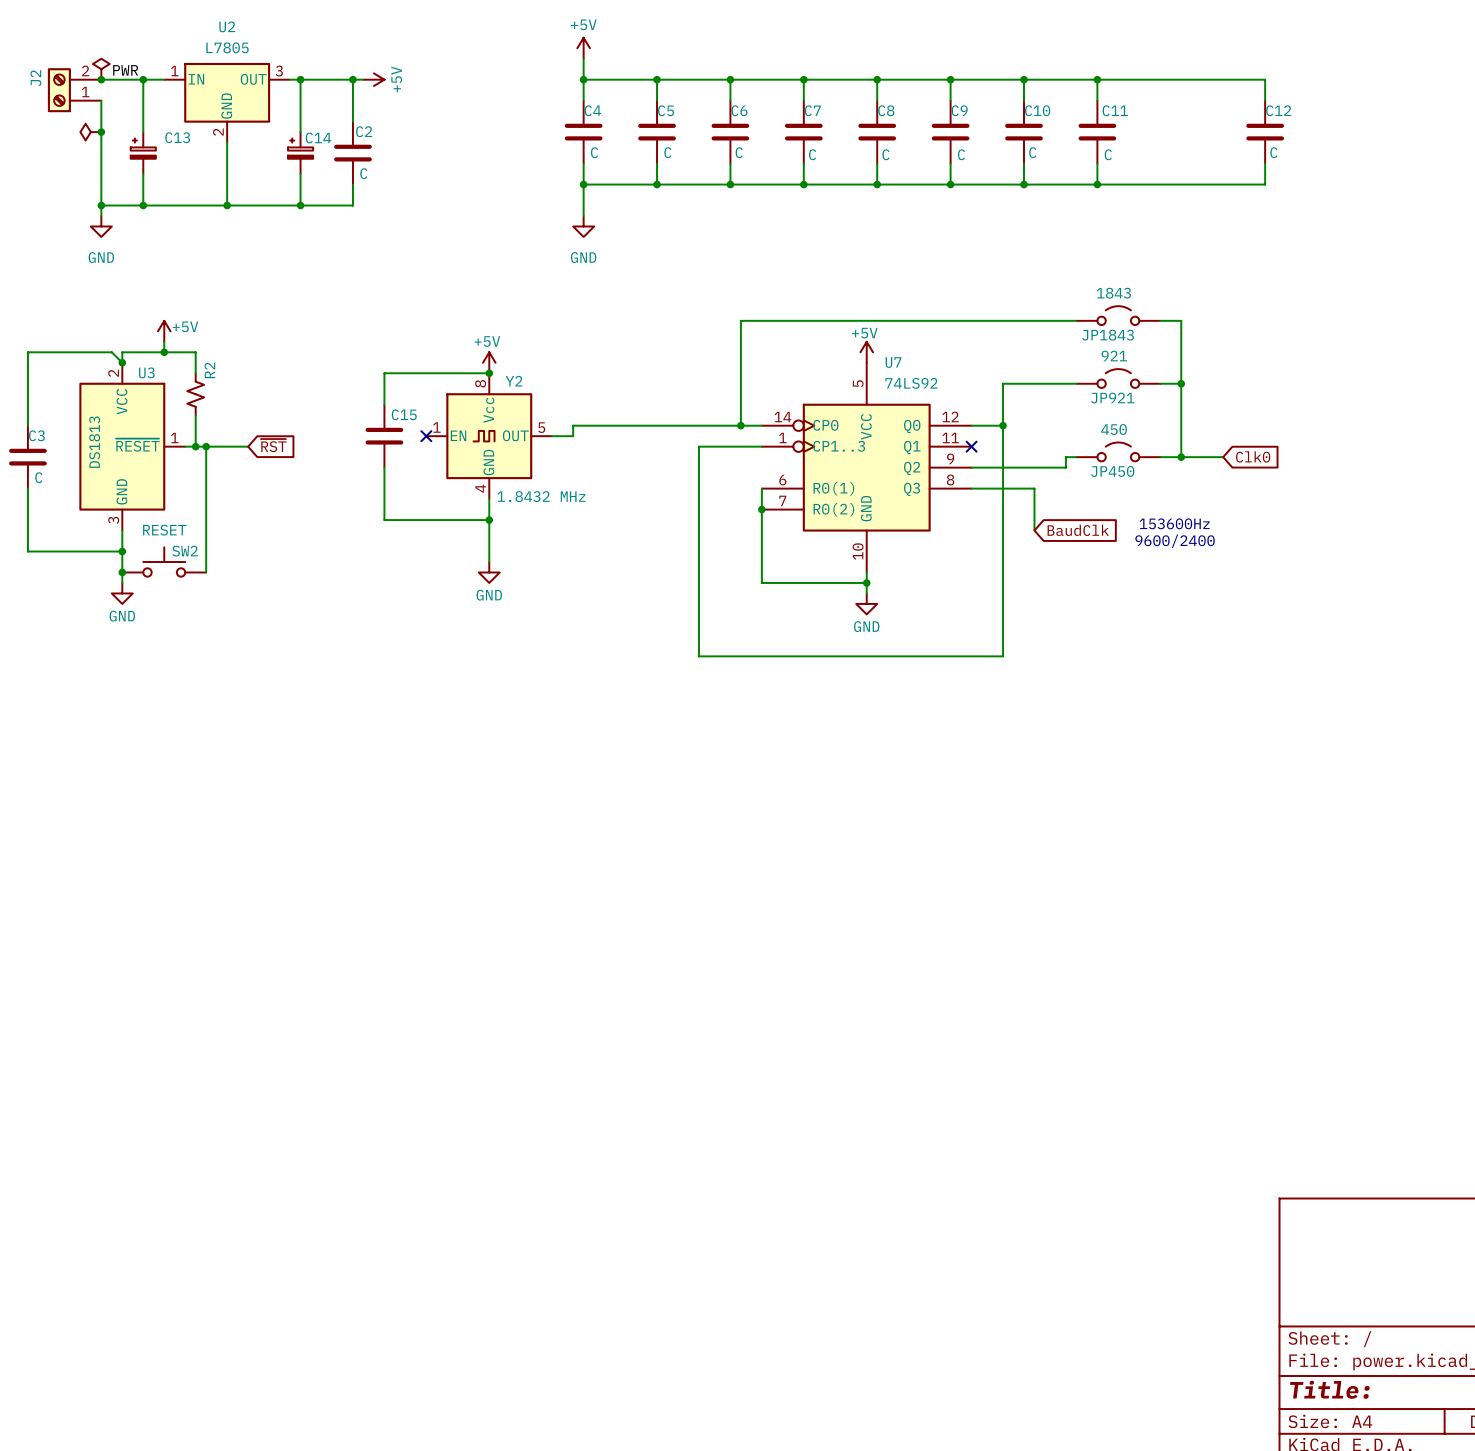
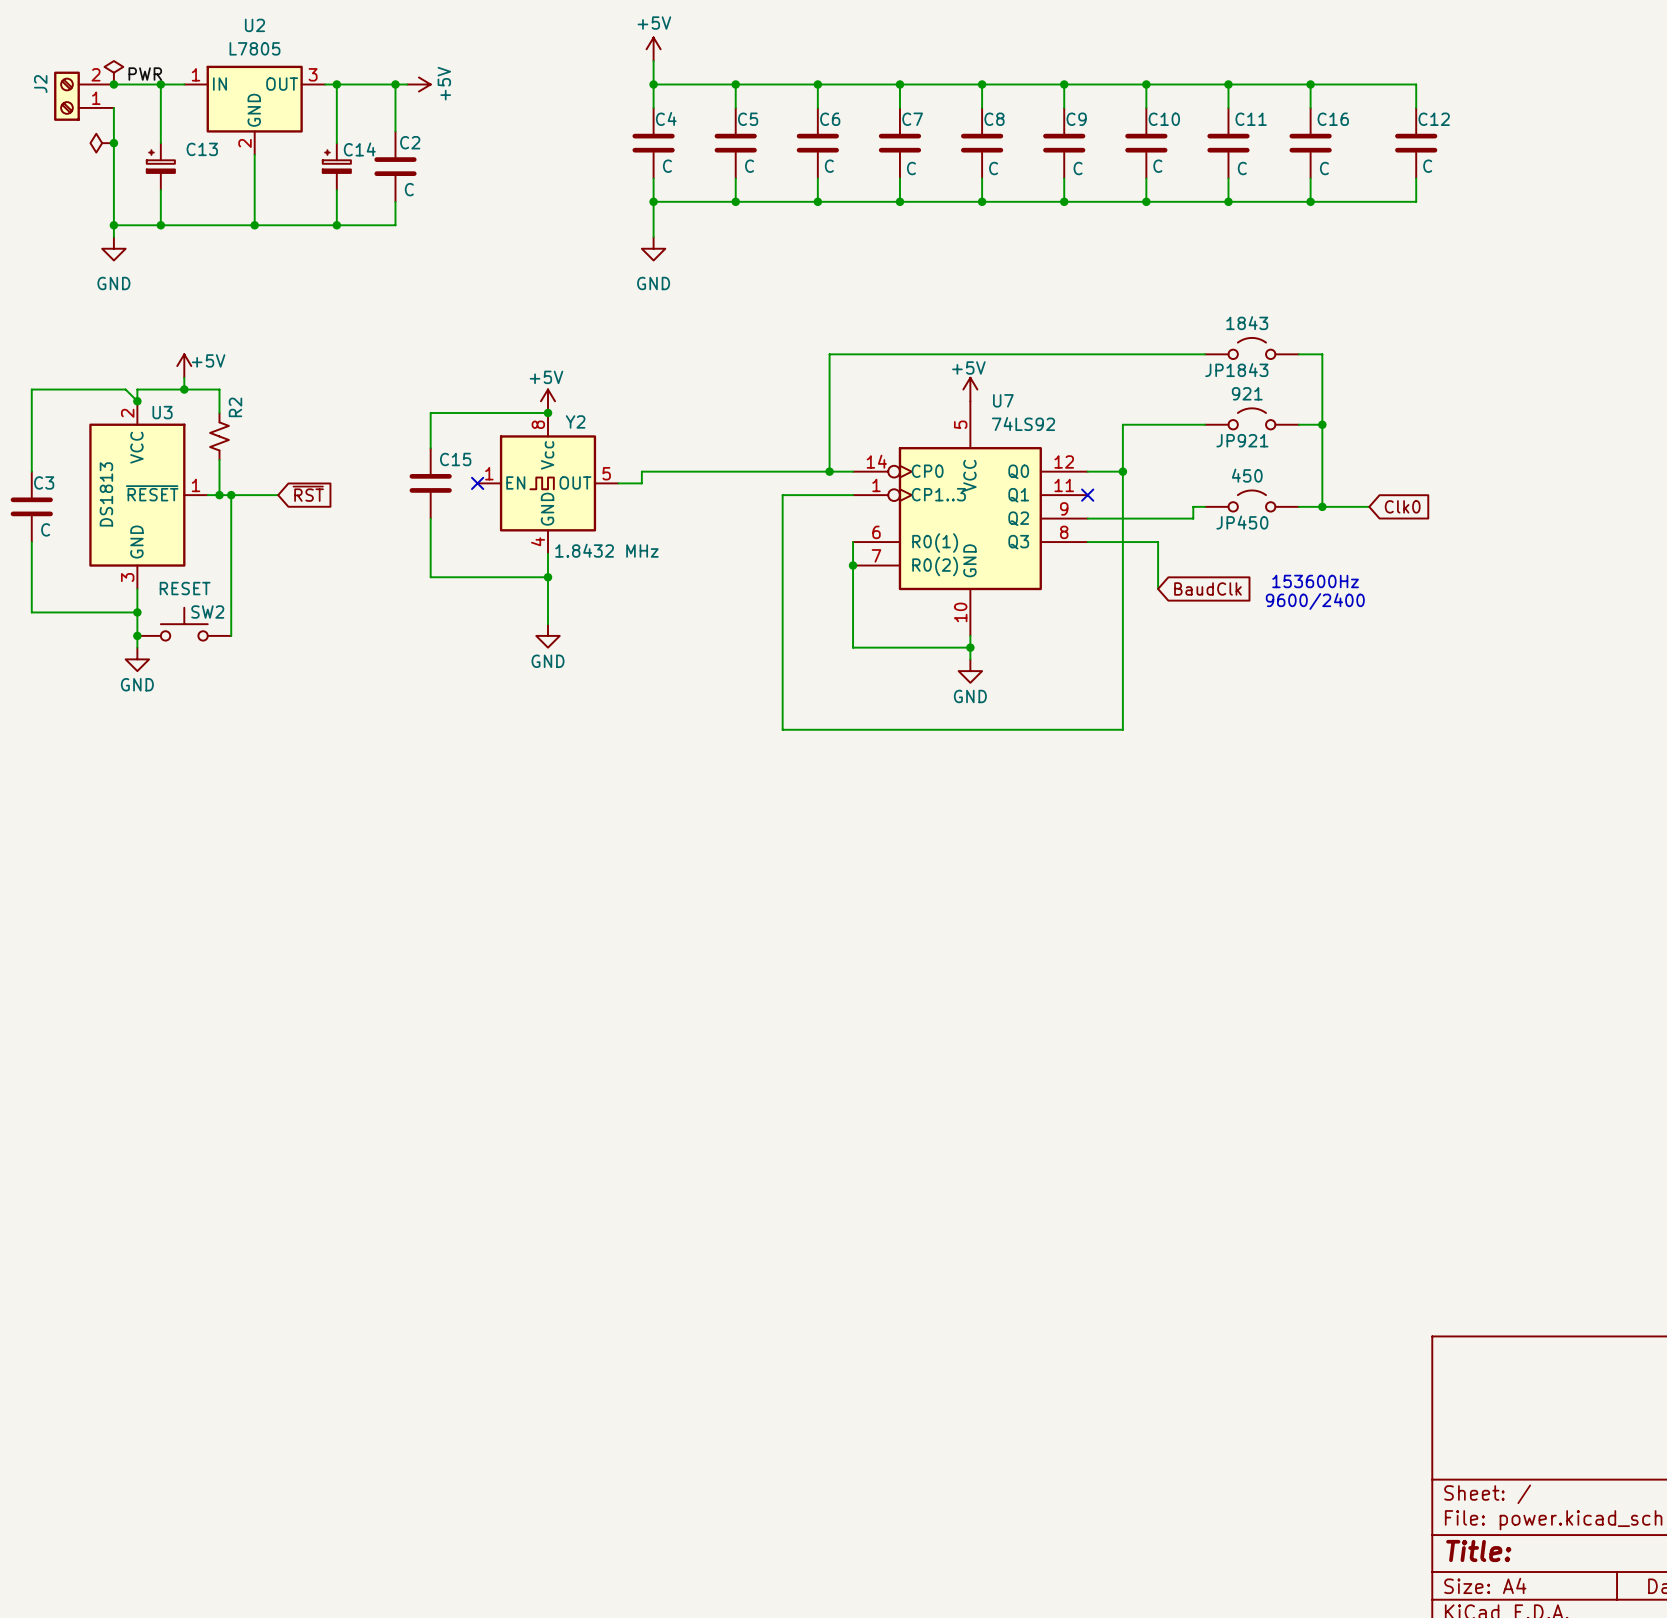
wire: none -> (1310, 84) (1310, 107)
junction: none -> (1310, 84)
C16: none -> C (1310, 143)
wire: none -> (1310, 178) (1310, 201)
junction: none -> (1310, 201)

